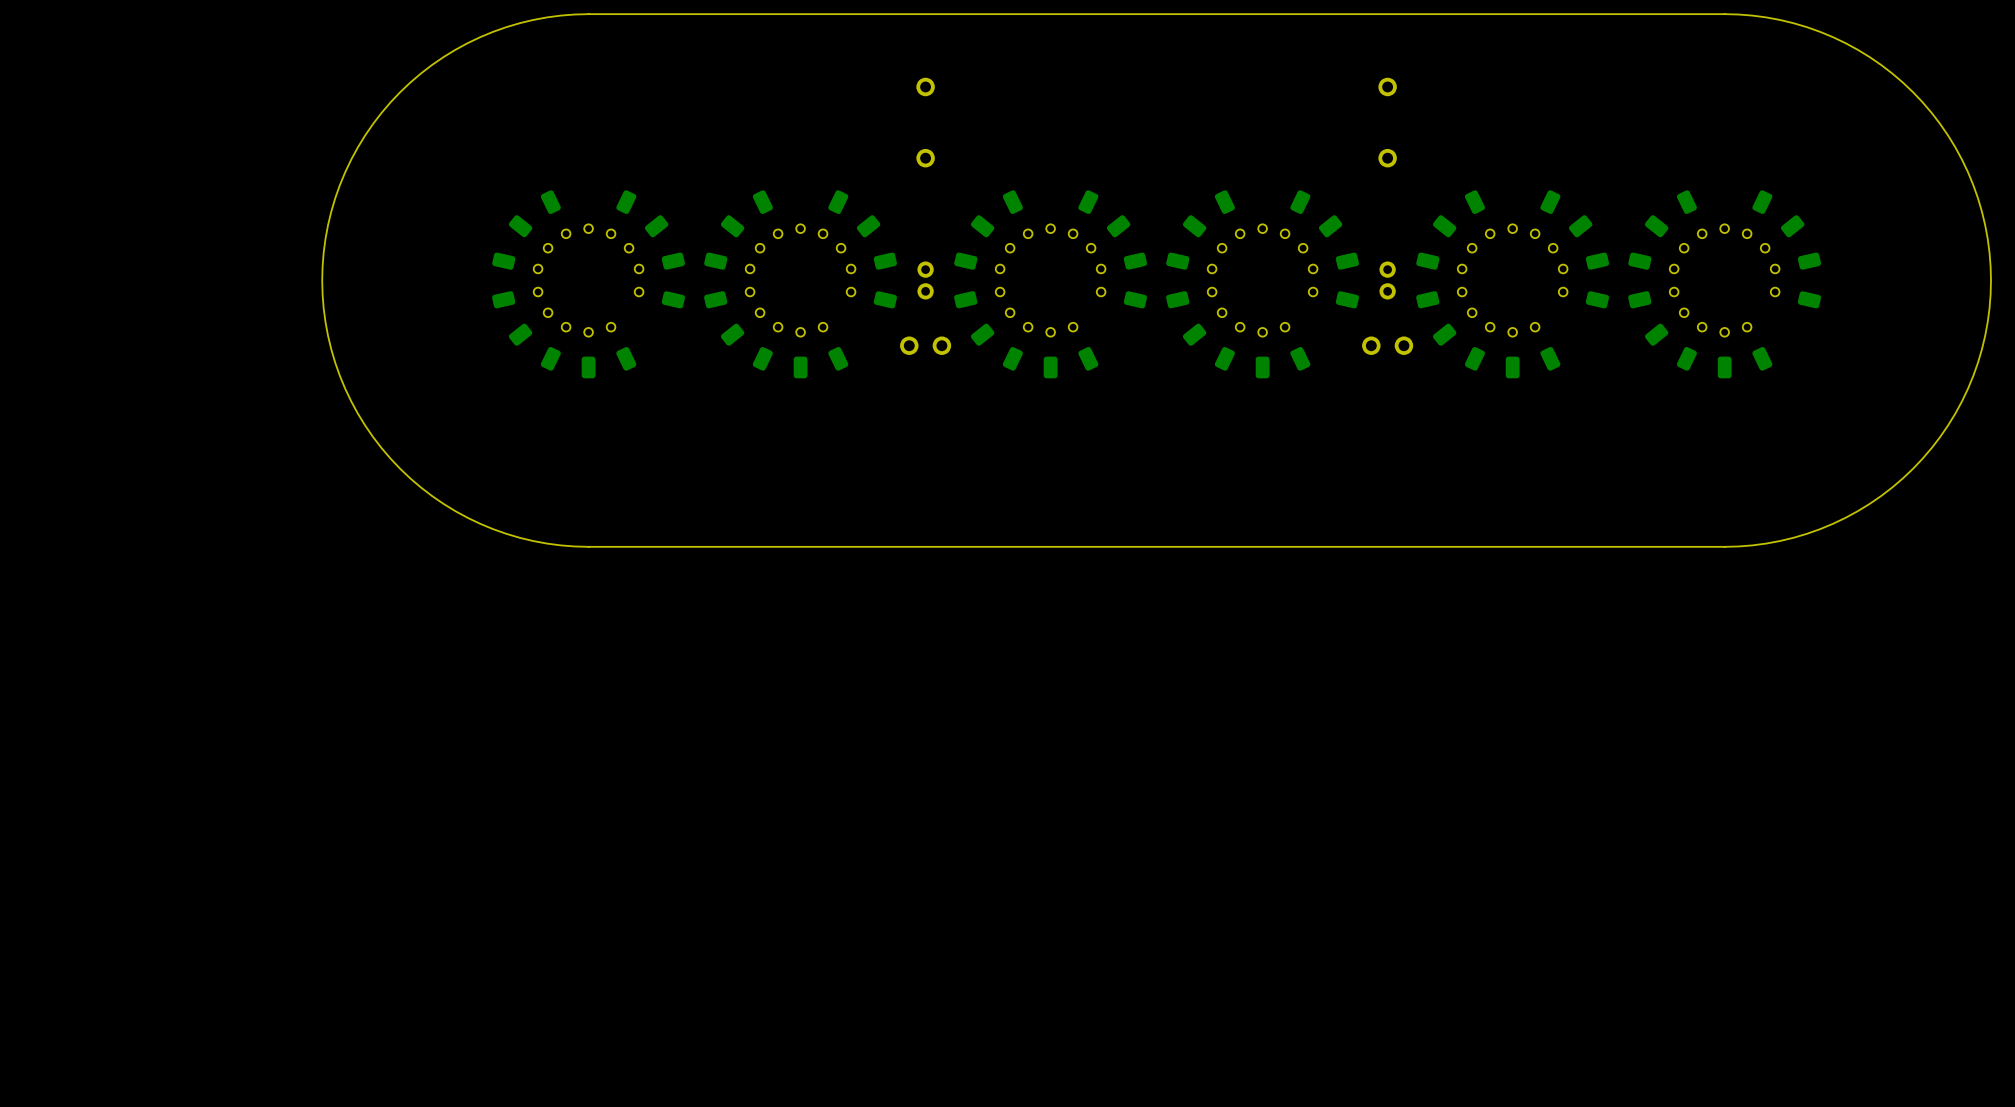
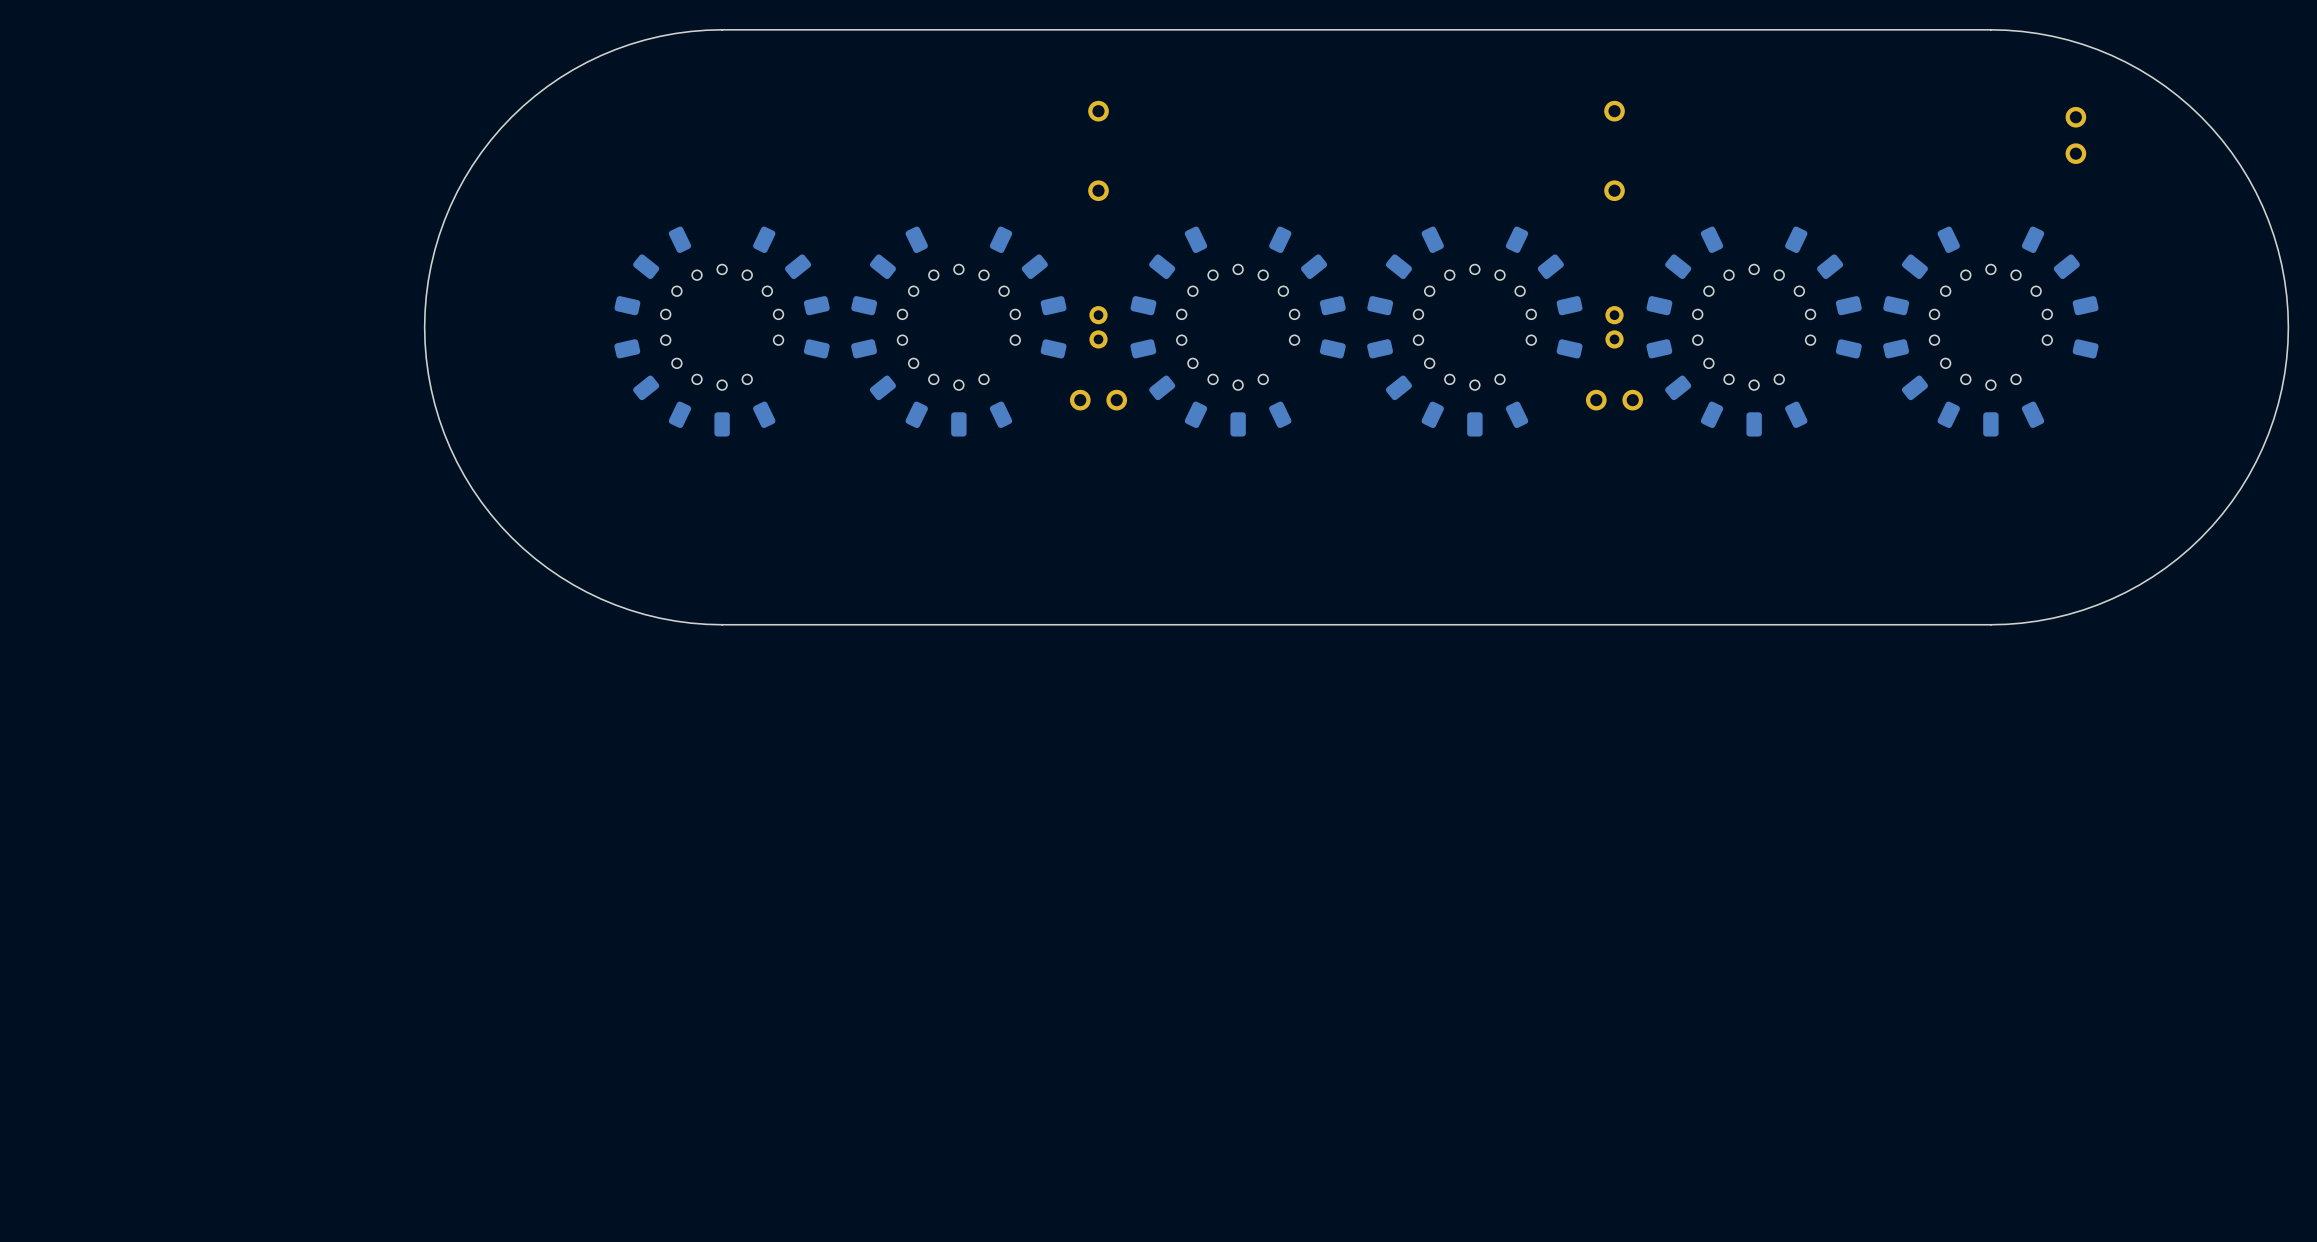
part: none -> (2075, 117)
part: none -> (2075, 153)

